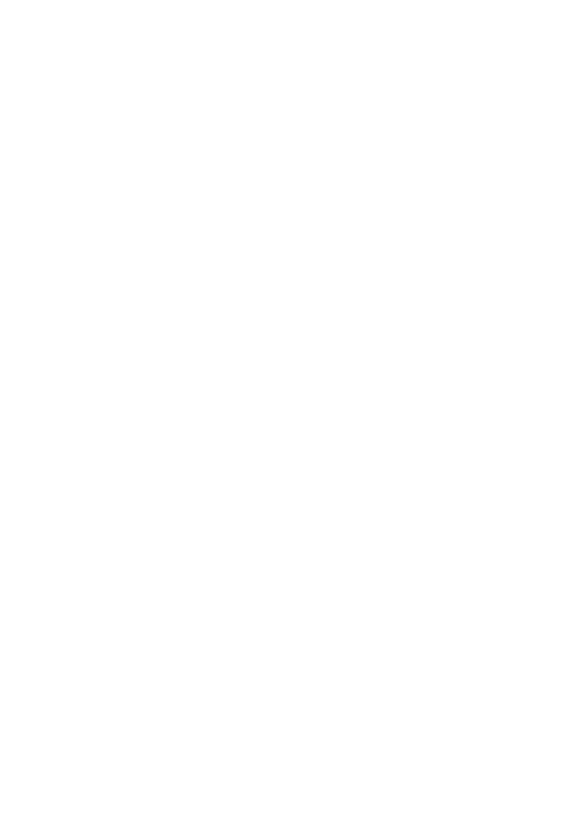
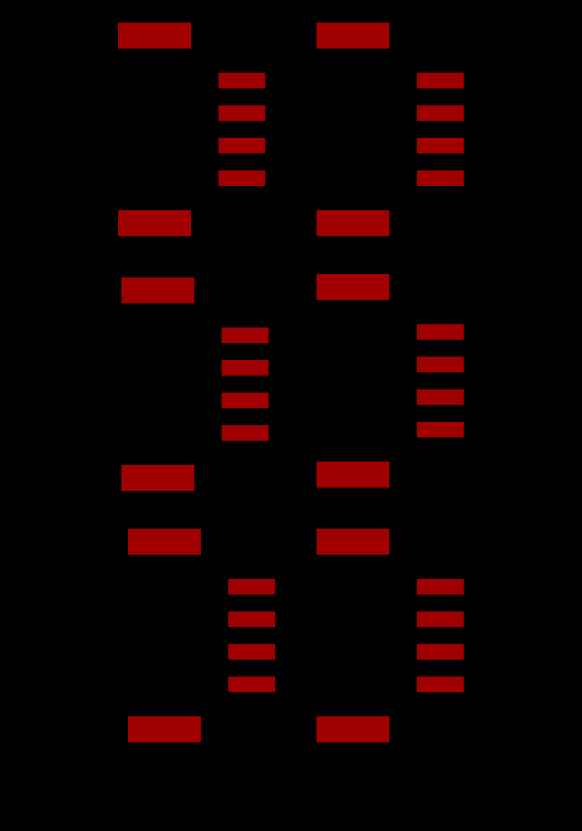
part: none -> (191, 129)
part: none -> (390, 129)
part: none -> (390, 380)
part: none -> (194, 384)
part: none -> (201, 635)
part: none -> (390, 635)

